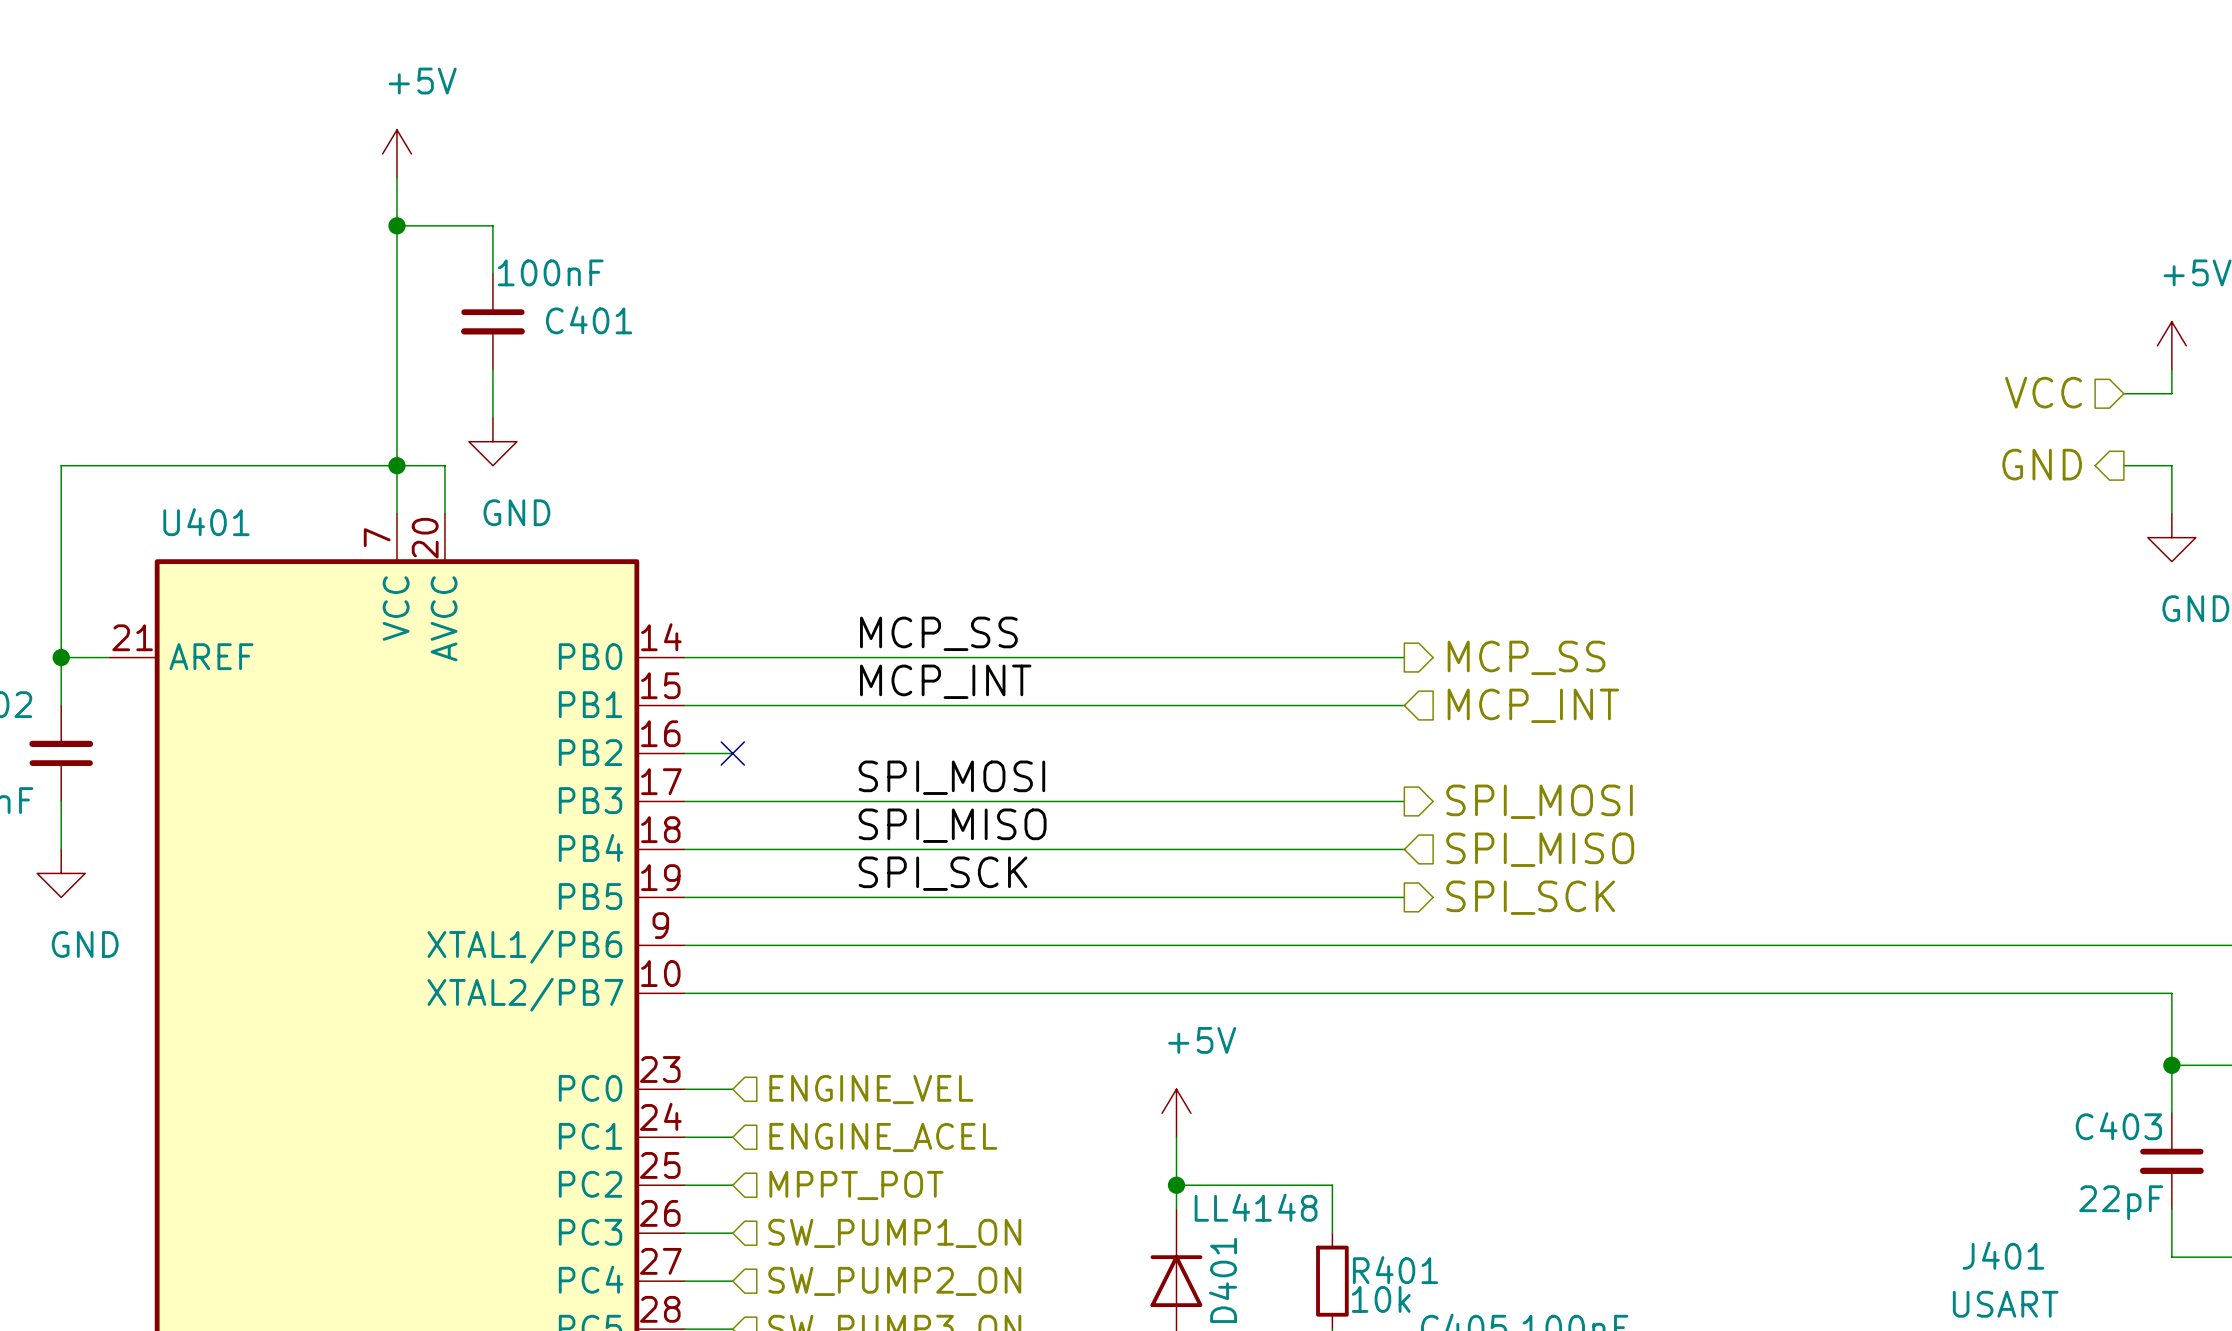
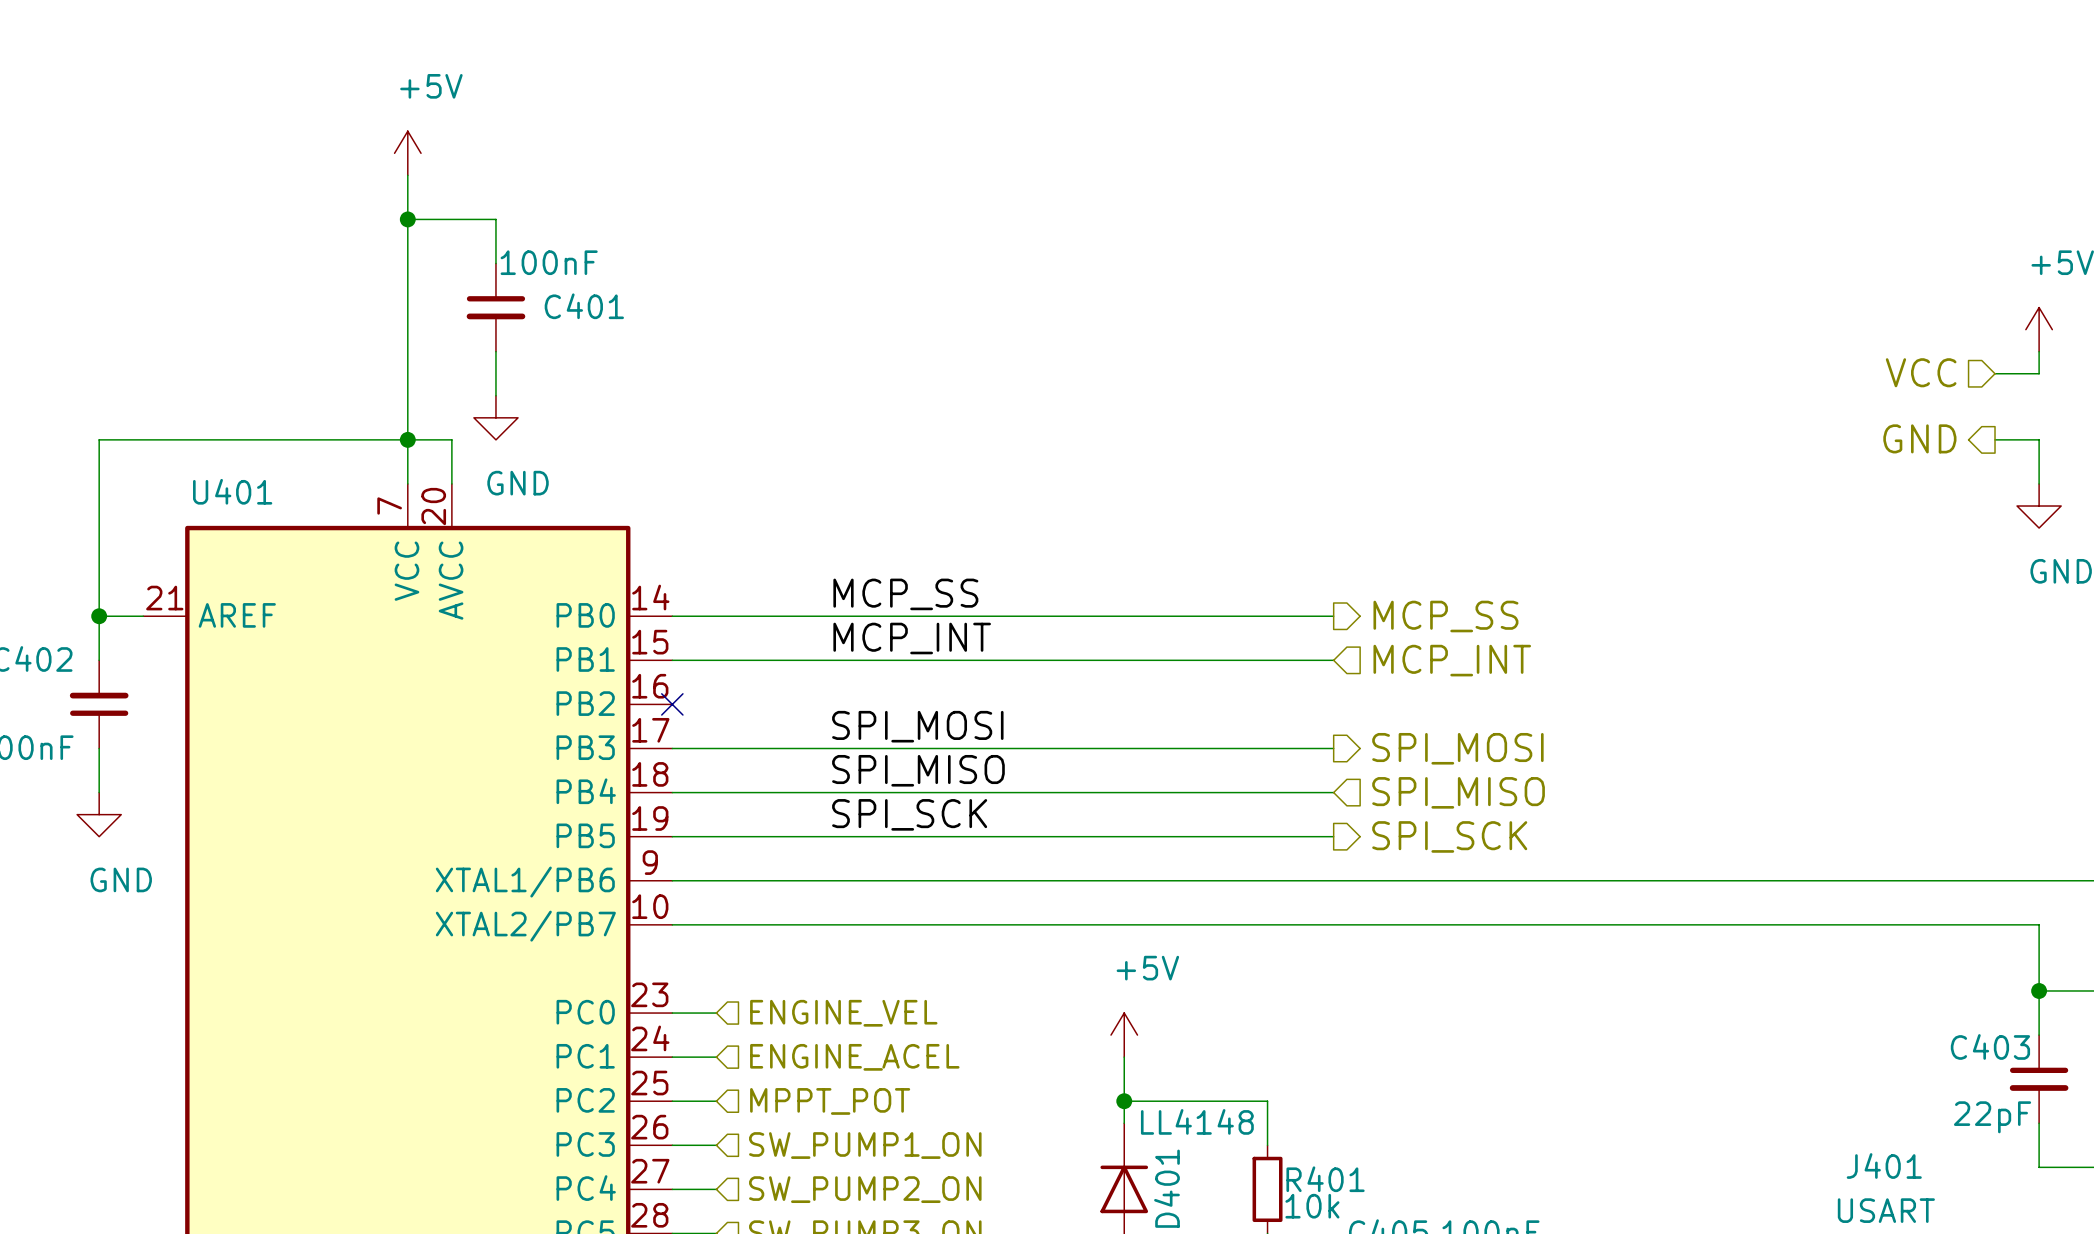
wire: (684, 753) (732, 753) -> none
no-connect mark position: (732, 753) -> (672, 704)

